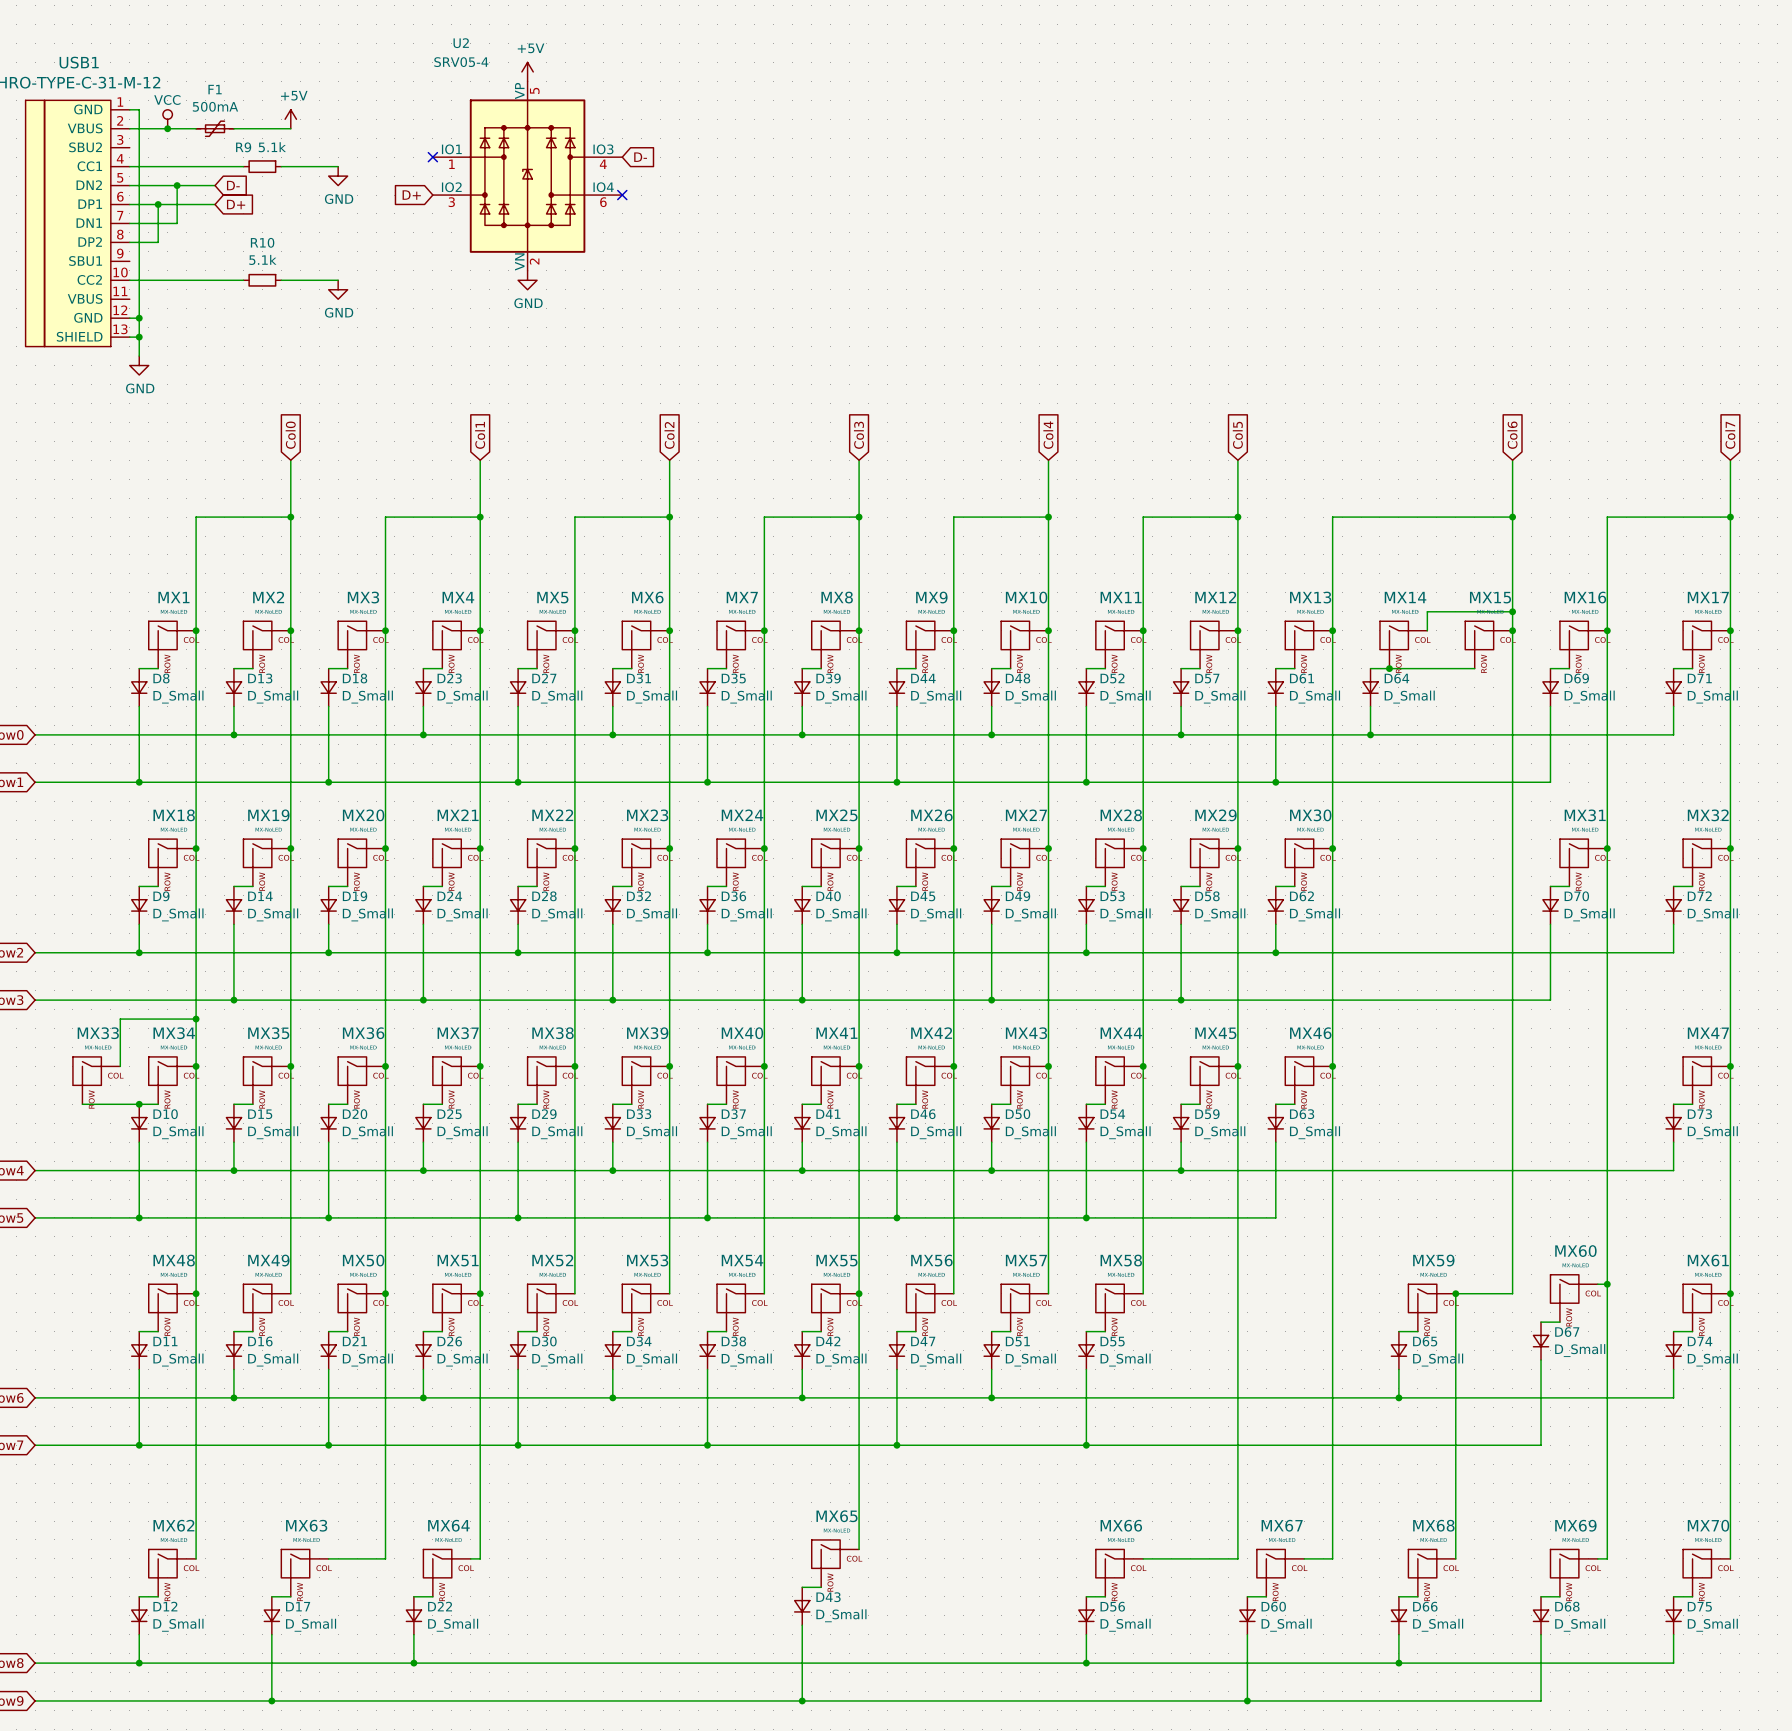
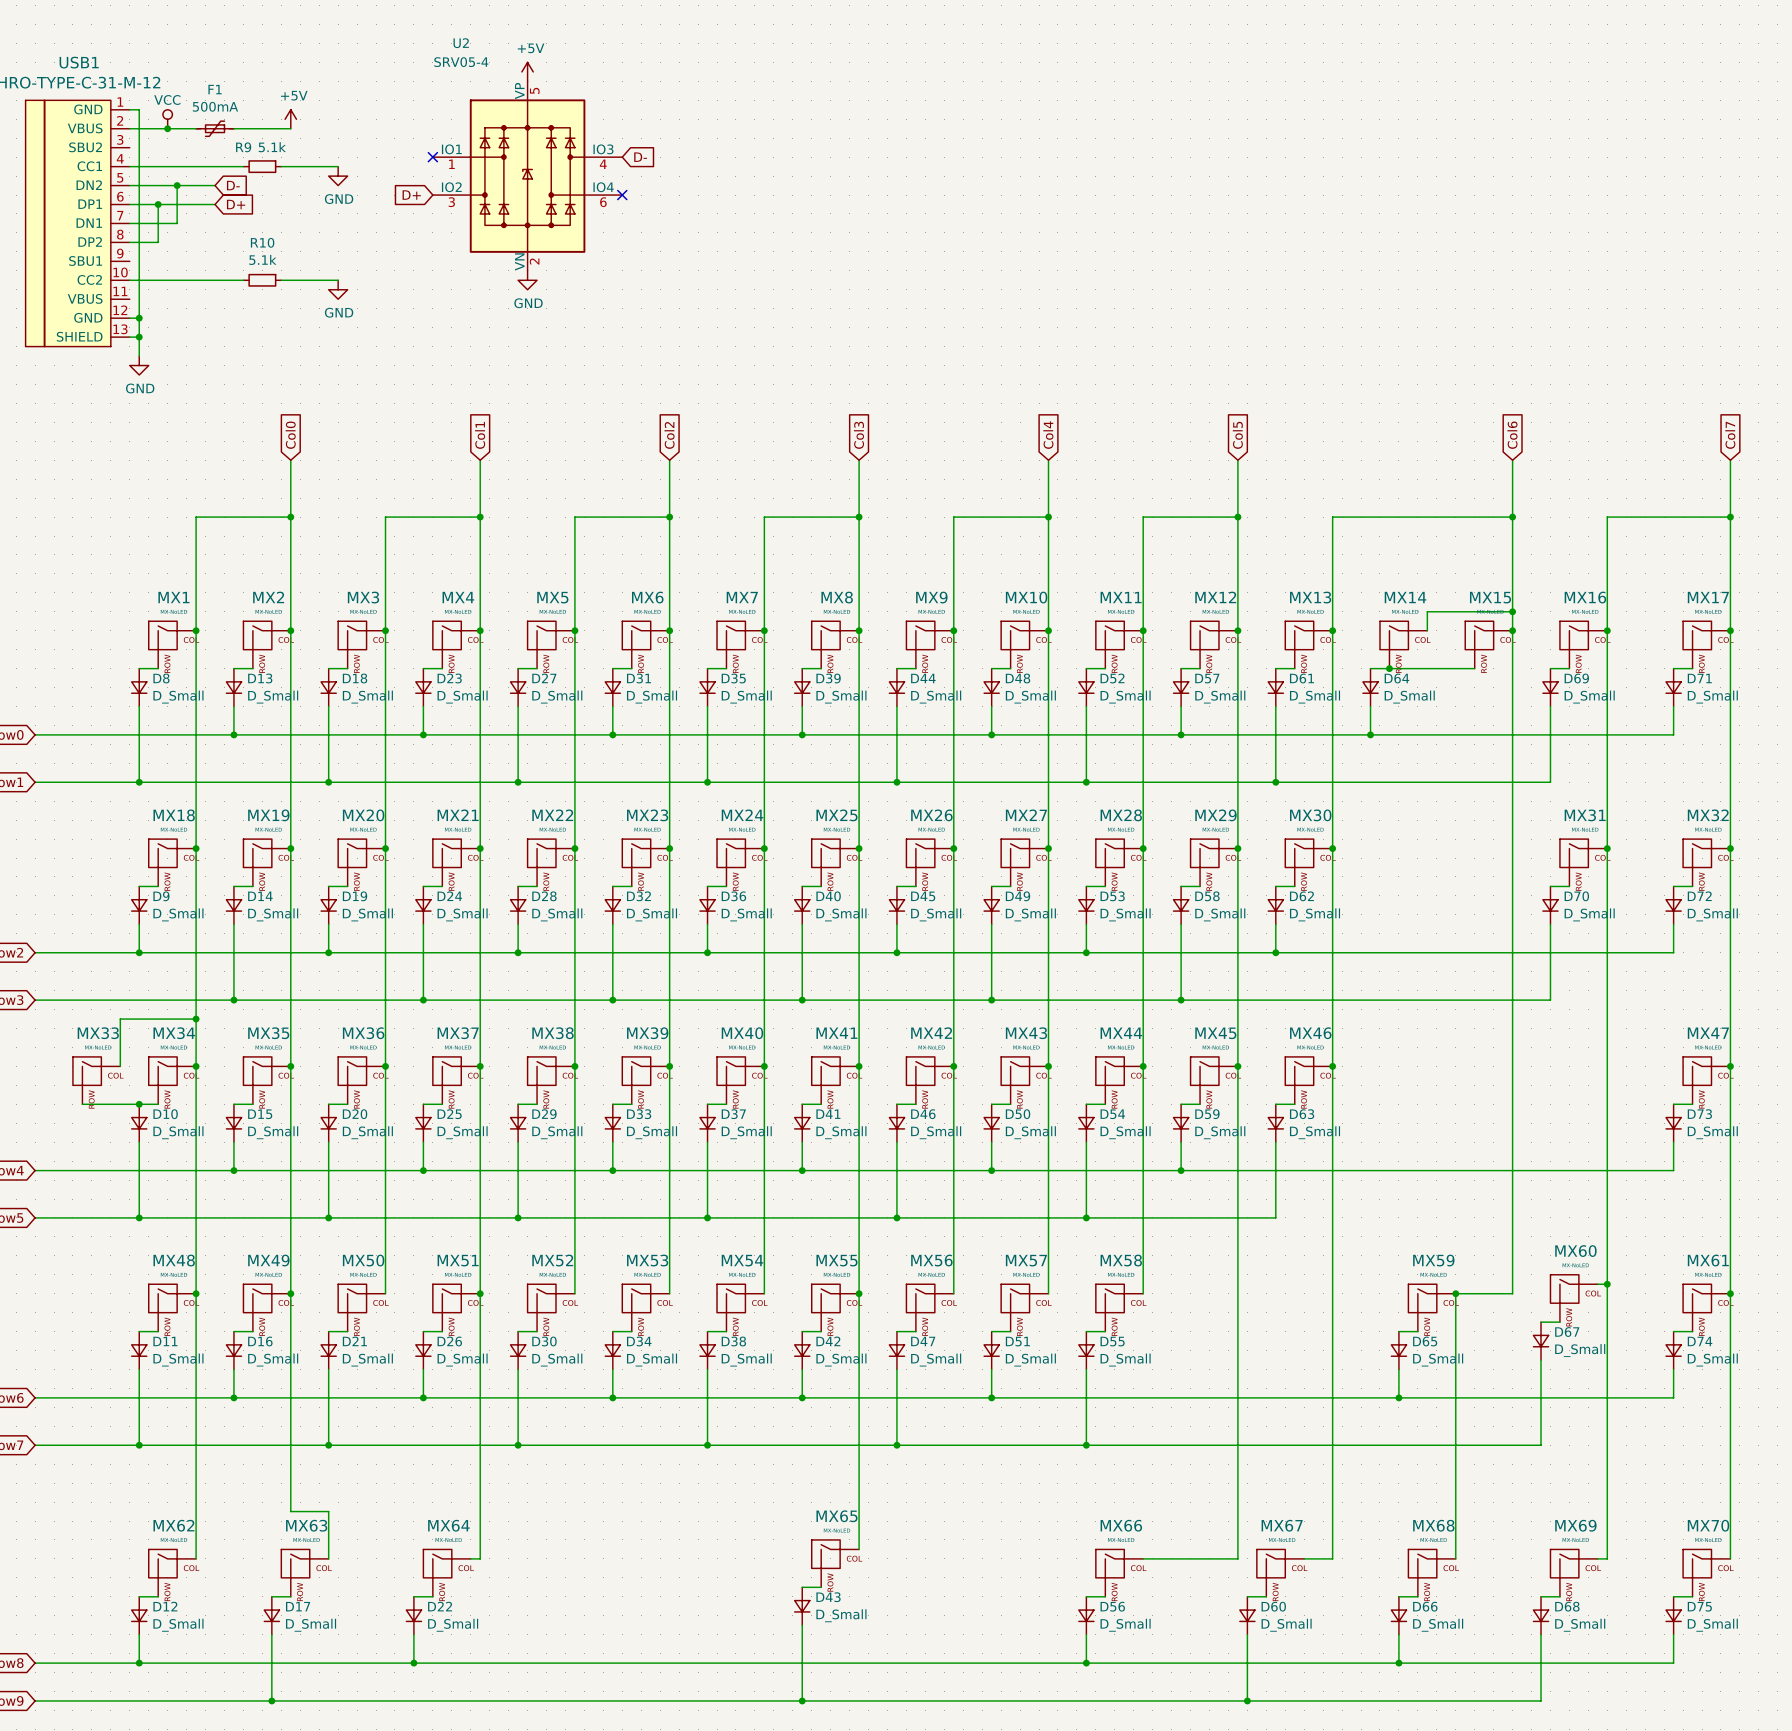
junction: none -> (290, 1293)
wire: (385, 1293) (385, 1558) (328, 1558) -> (290, 1293) (290, 1511) (328, 1511) (328, 1558)
junction: (385, 1293) -> none

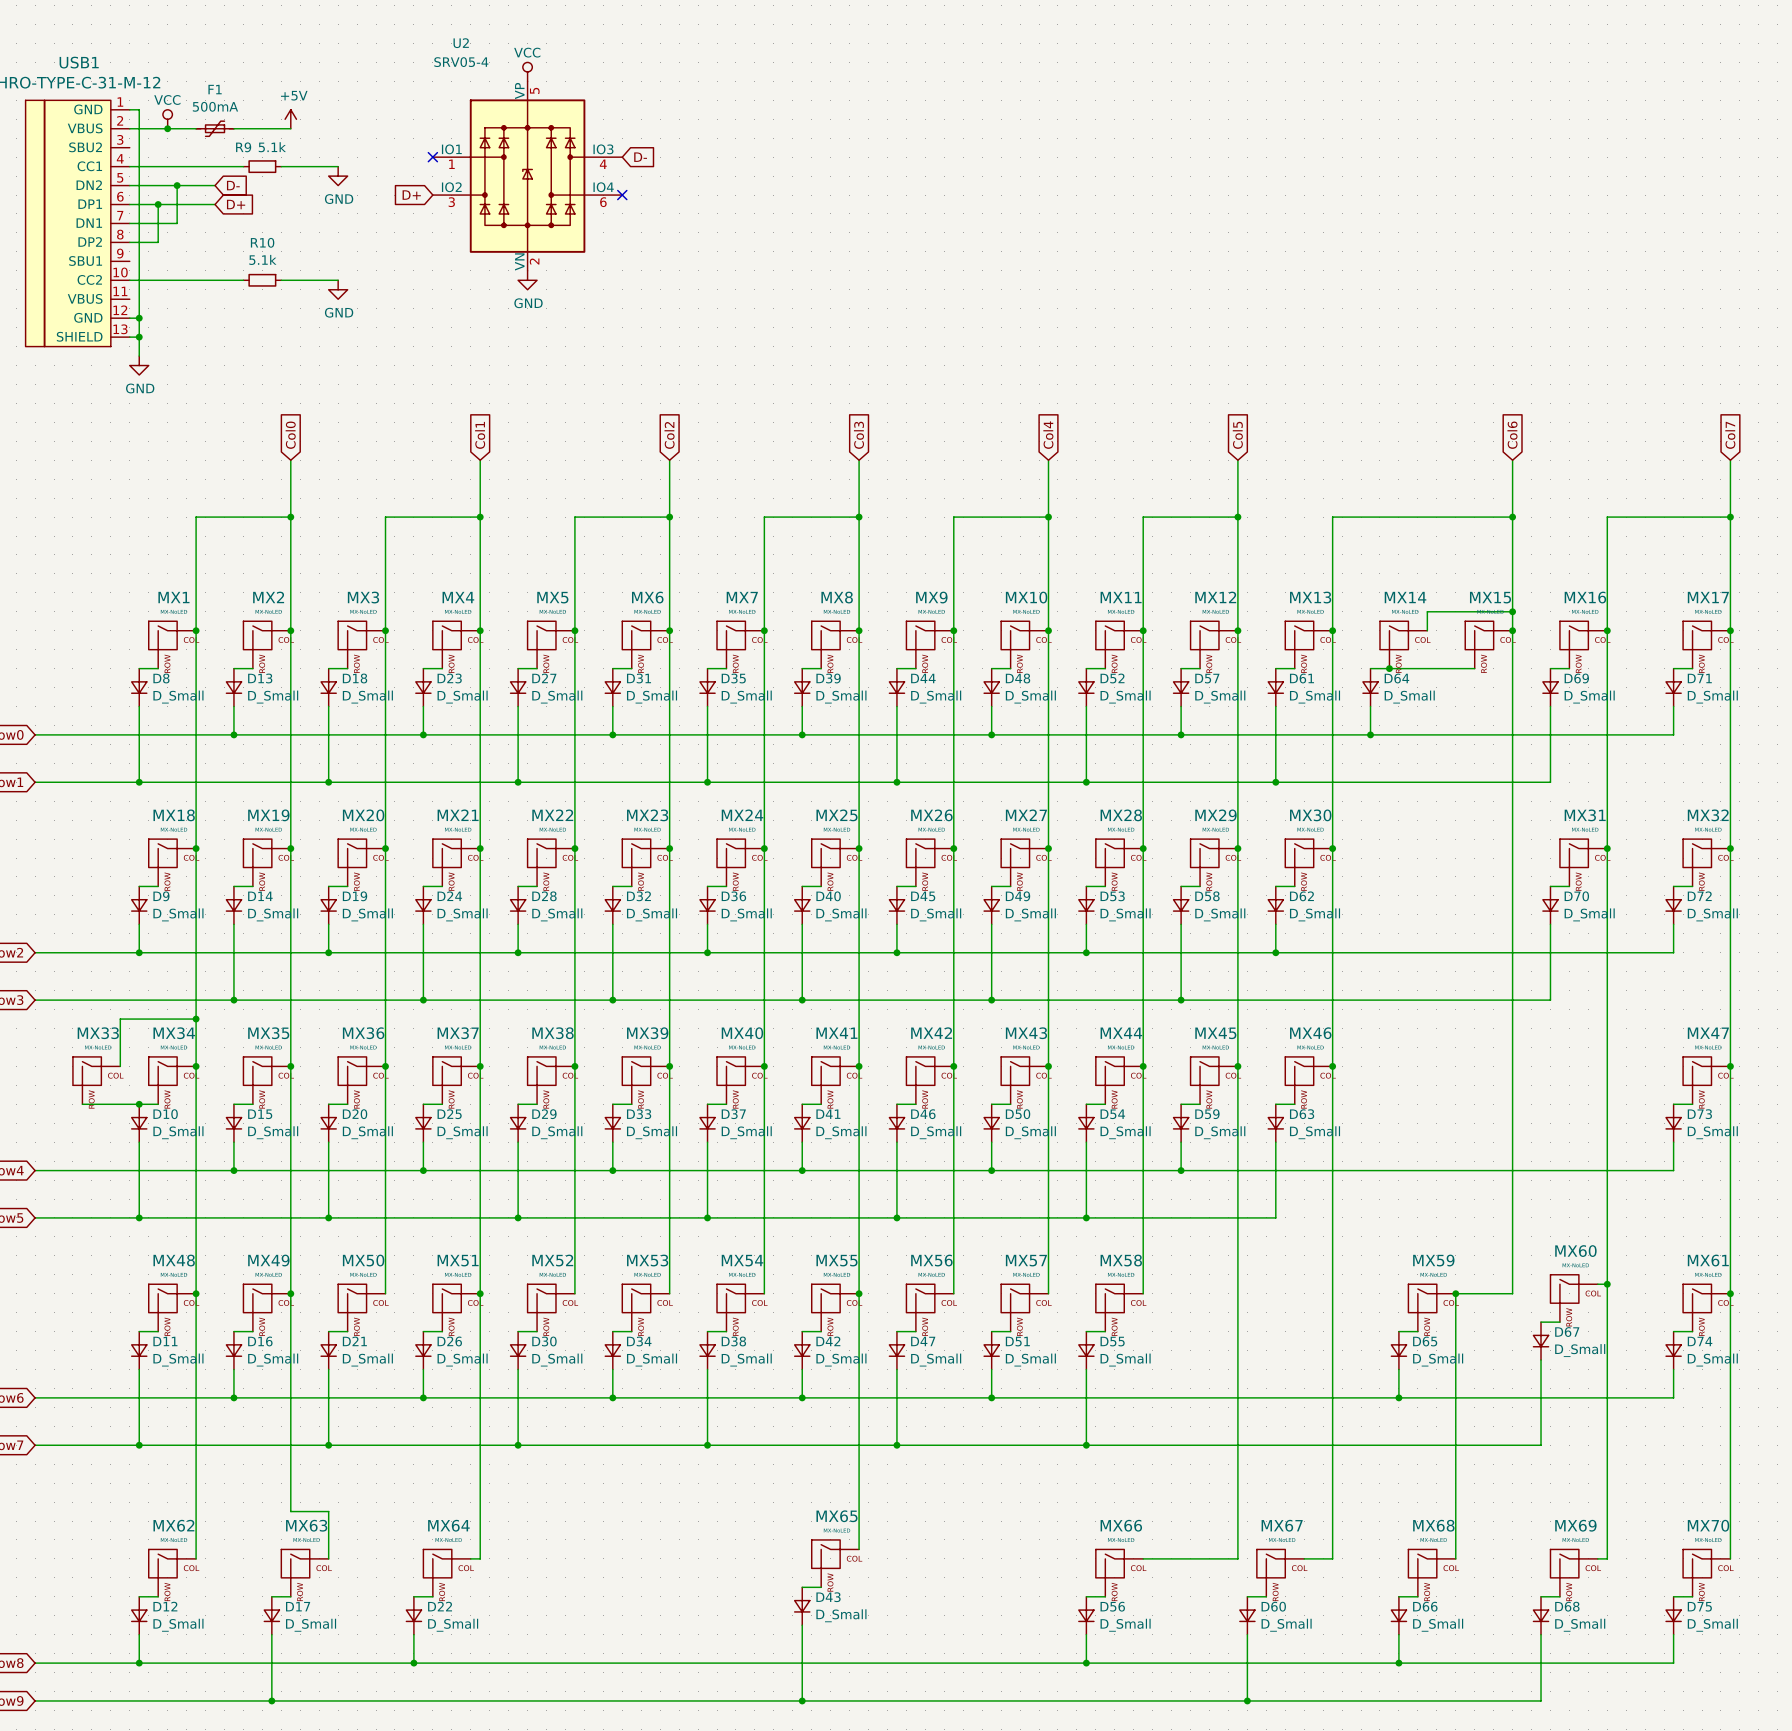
power symbol: +5V (527, 71) -> VCC (527, 71)

